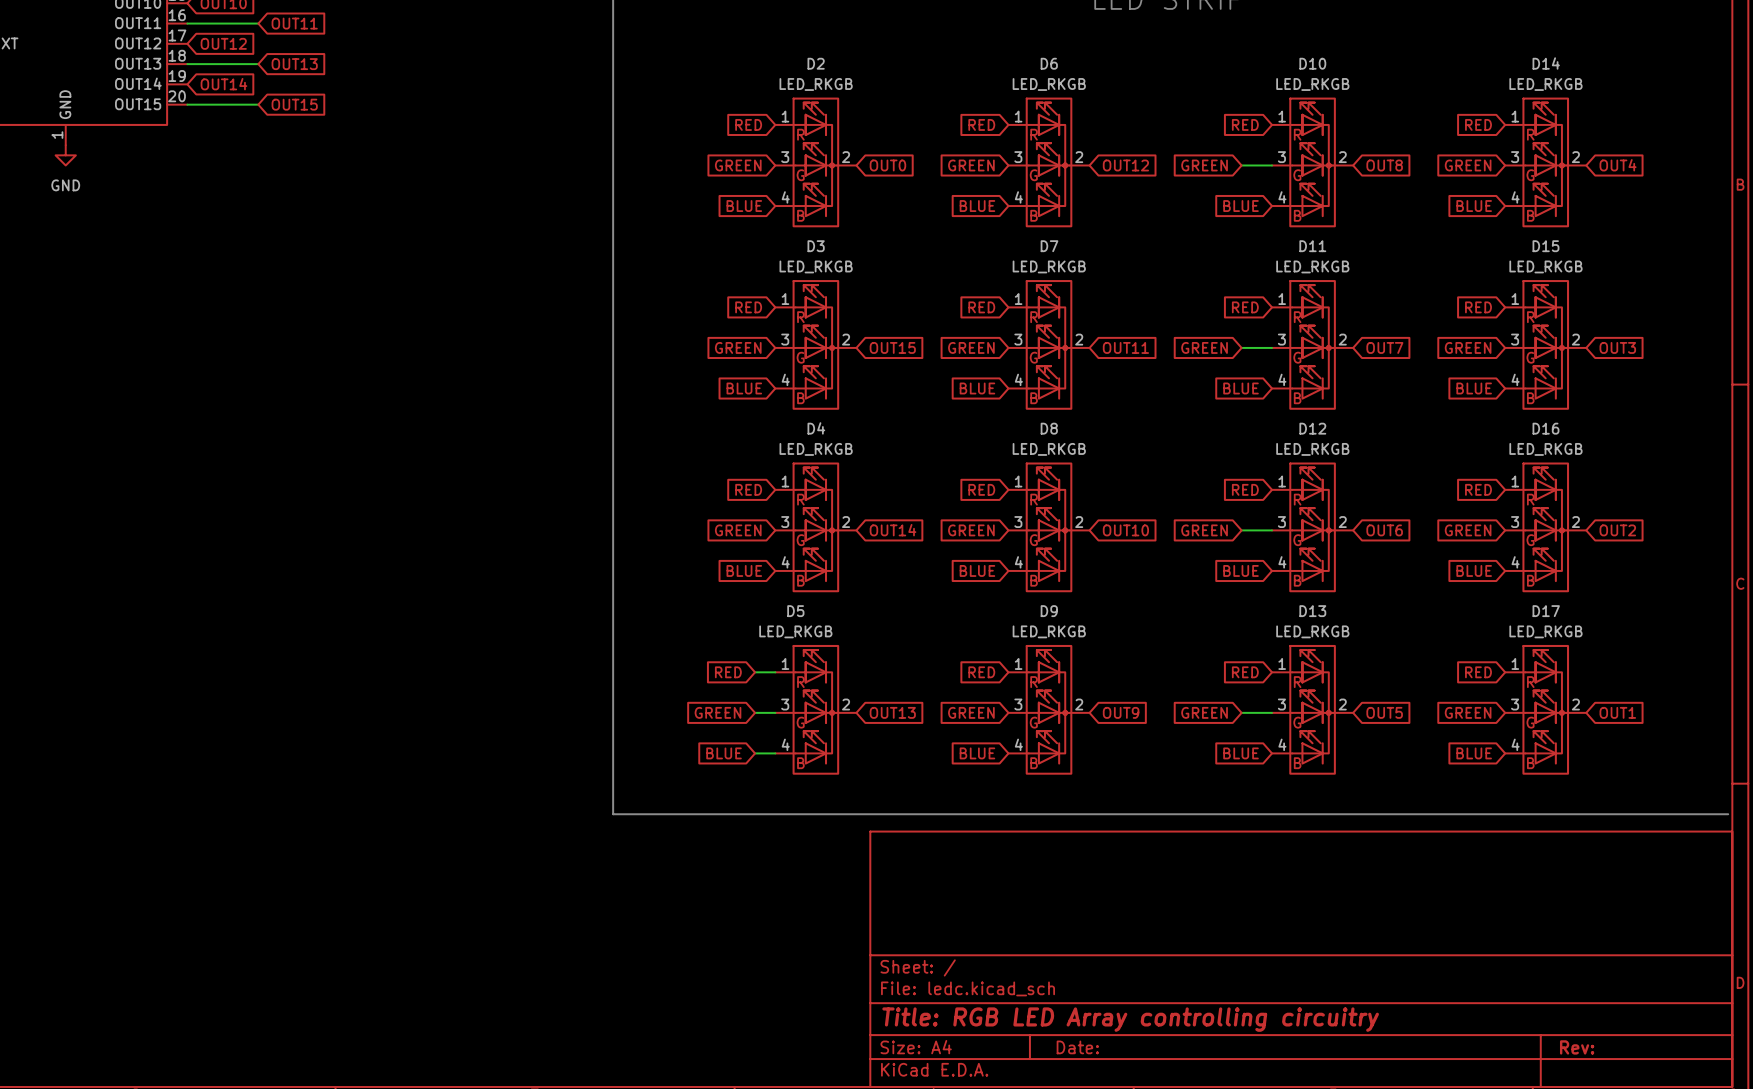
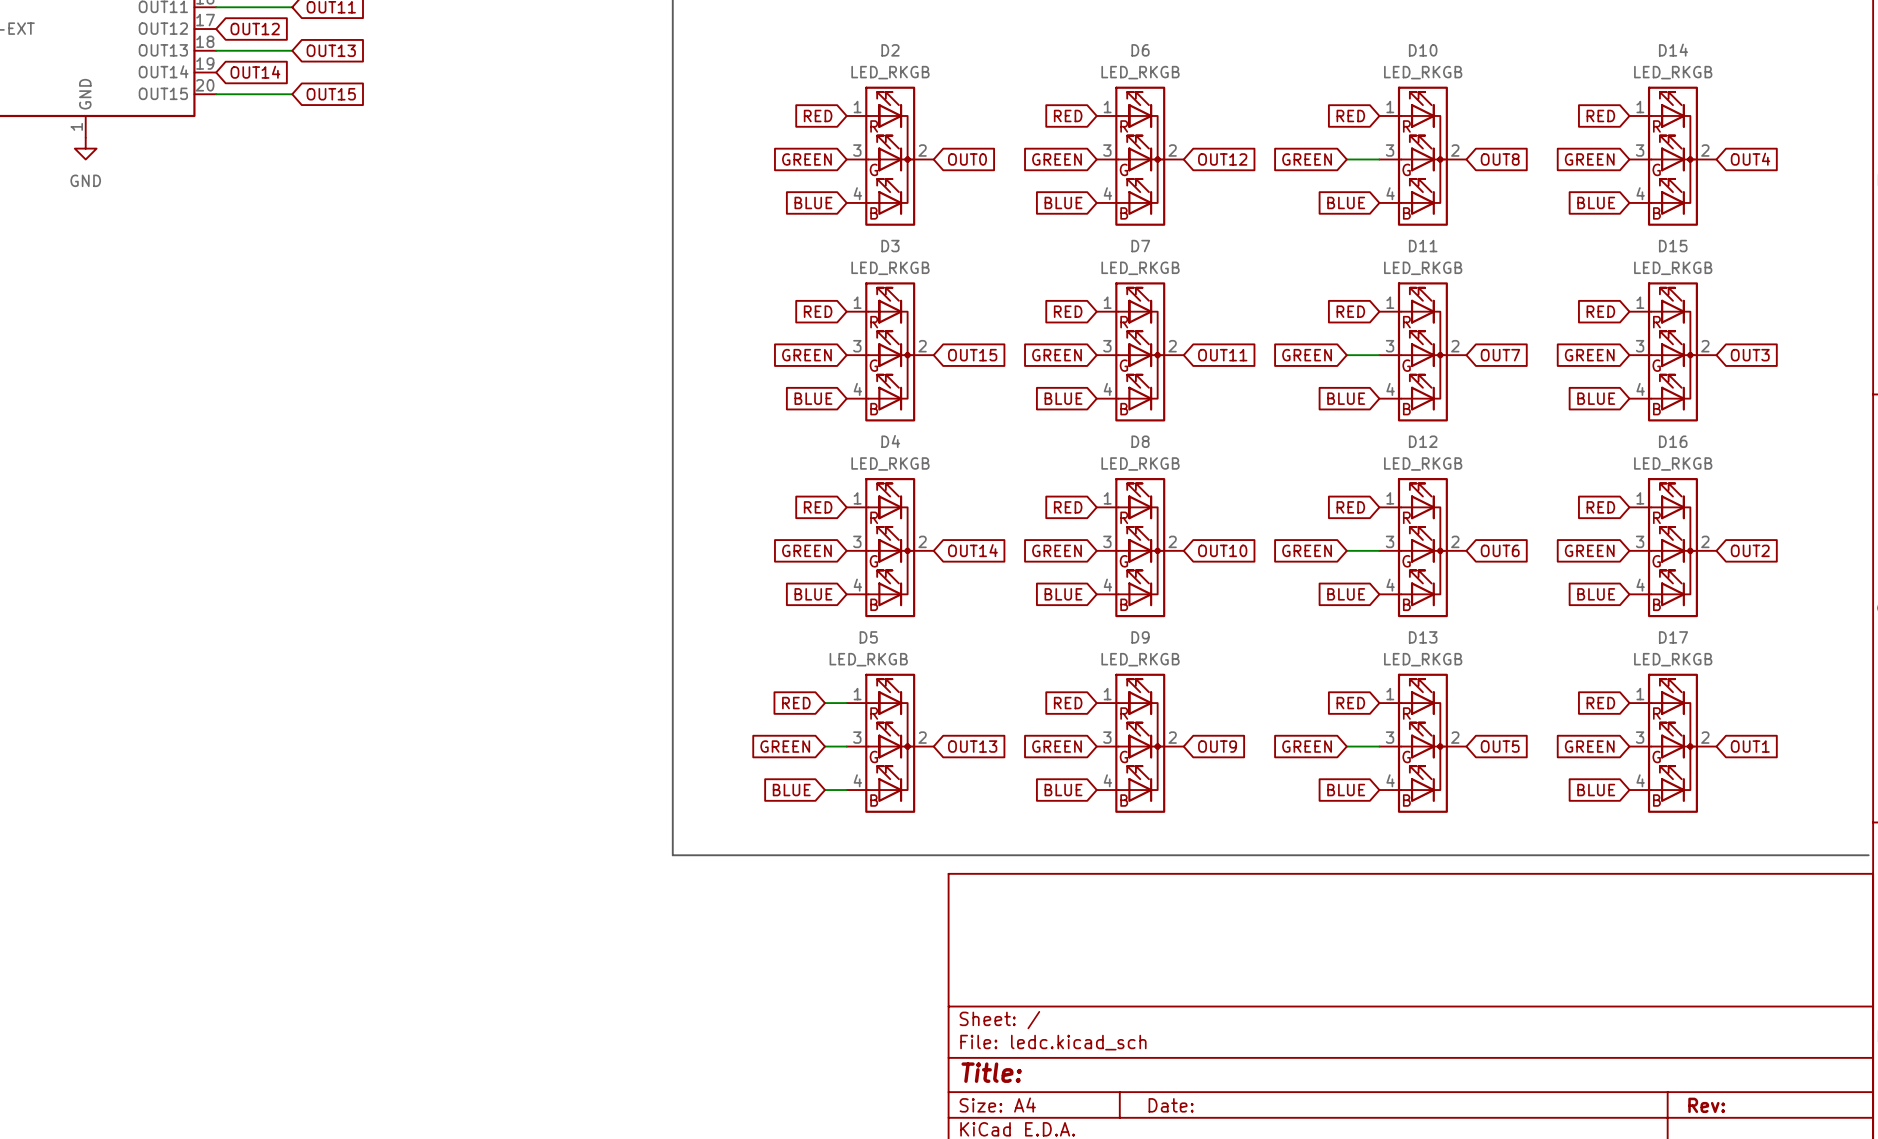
title block: Title: RGB LED Array controlling circuitry (1130, 1019) -> Title: (991, 1072)

